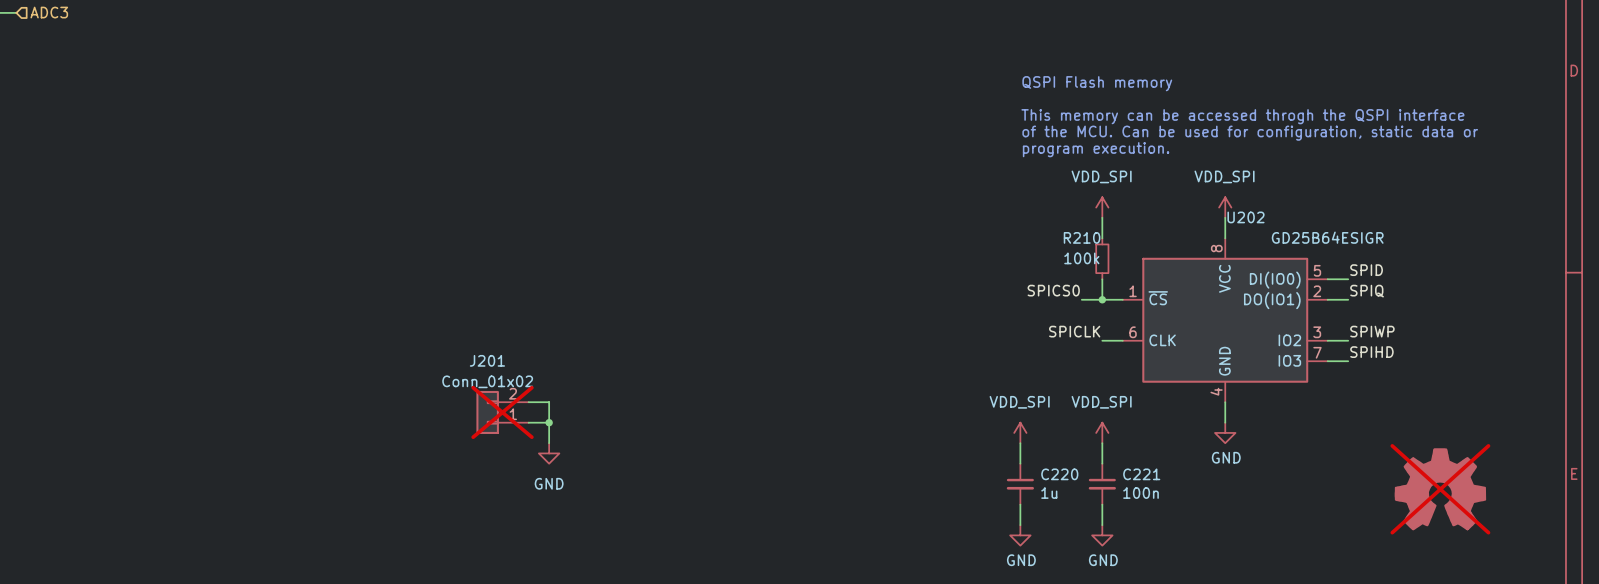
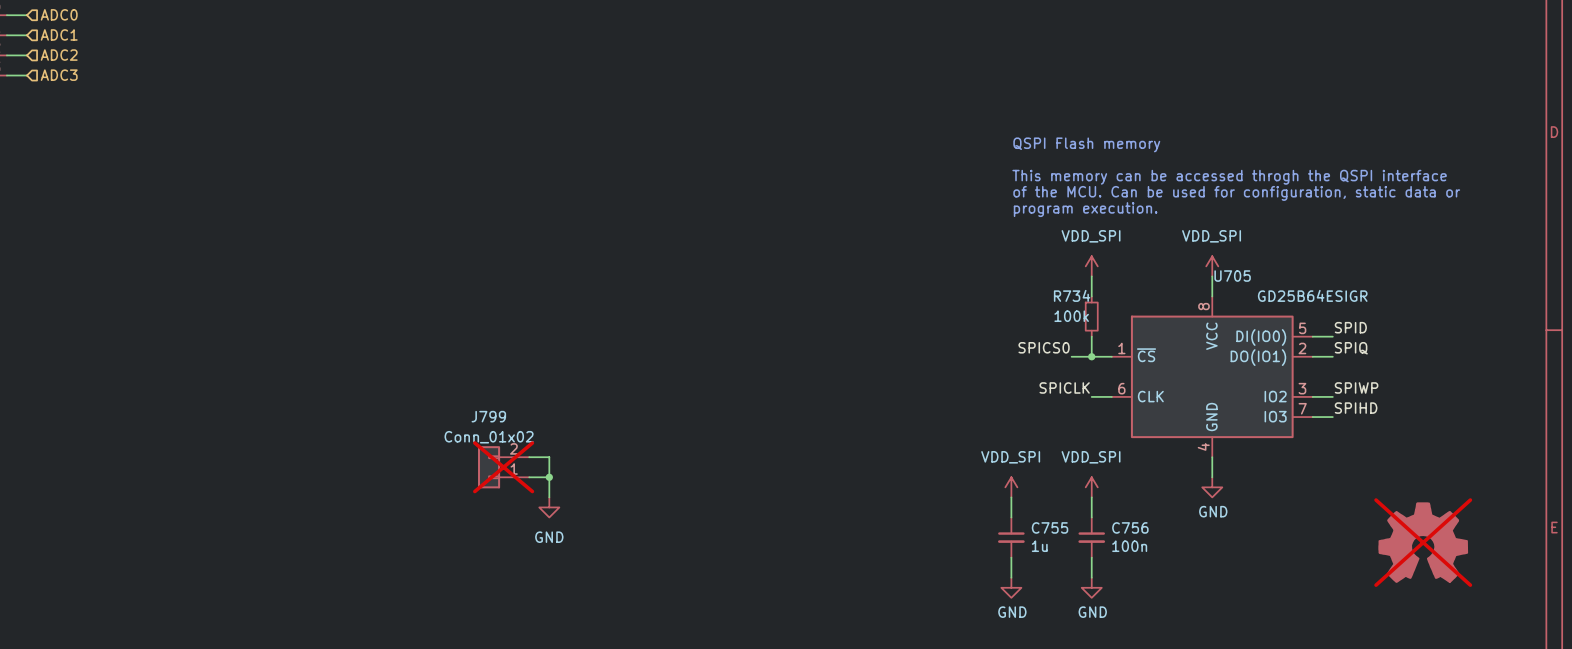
U202 name: U202 (1245, 217) -> U705 (1232, 276)
R210 name: R210 (1082, 237) -> R734 (1072, 295)
J201 name: J201 (487, 360) -> J799 (488, 416)
C220 name: C220 (1059, 474) -> C755 (1050, 527)
C221 name: C221 (1141, 474) -> C756 (1130, 527)

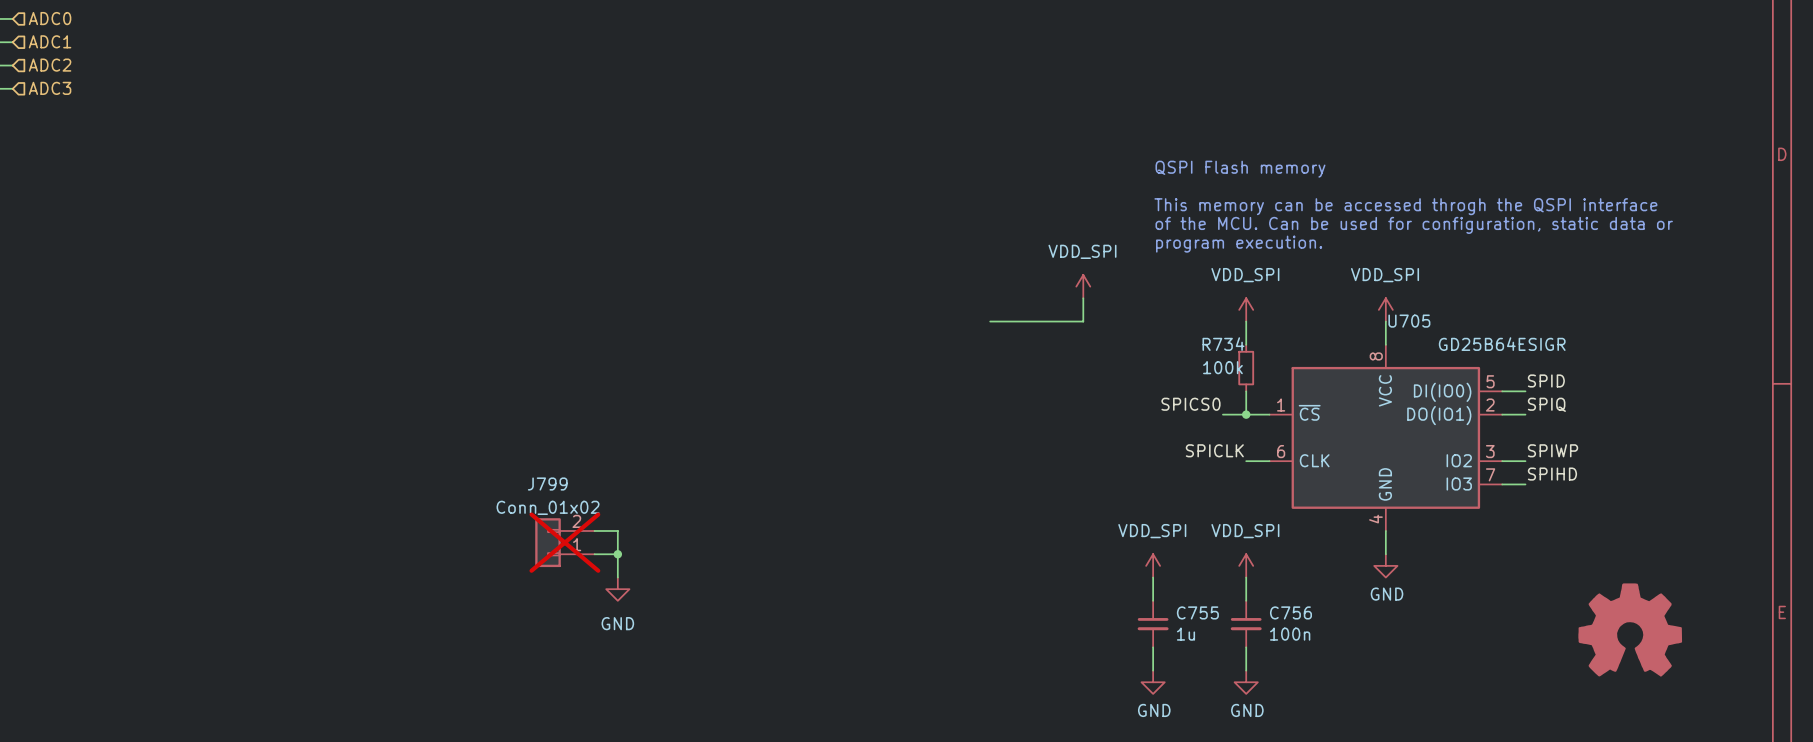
power symbol: none -> VDD_SPI (1083, 286)
wire: none -> (1083, 298) (1083, 321) (990, 321)
part do-not-place cross: (1423, 542) -> none

